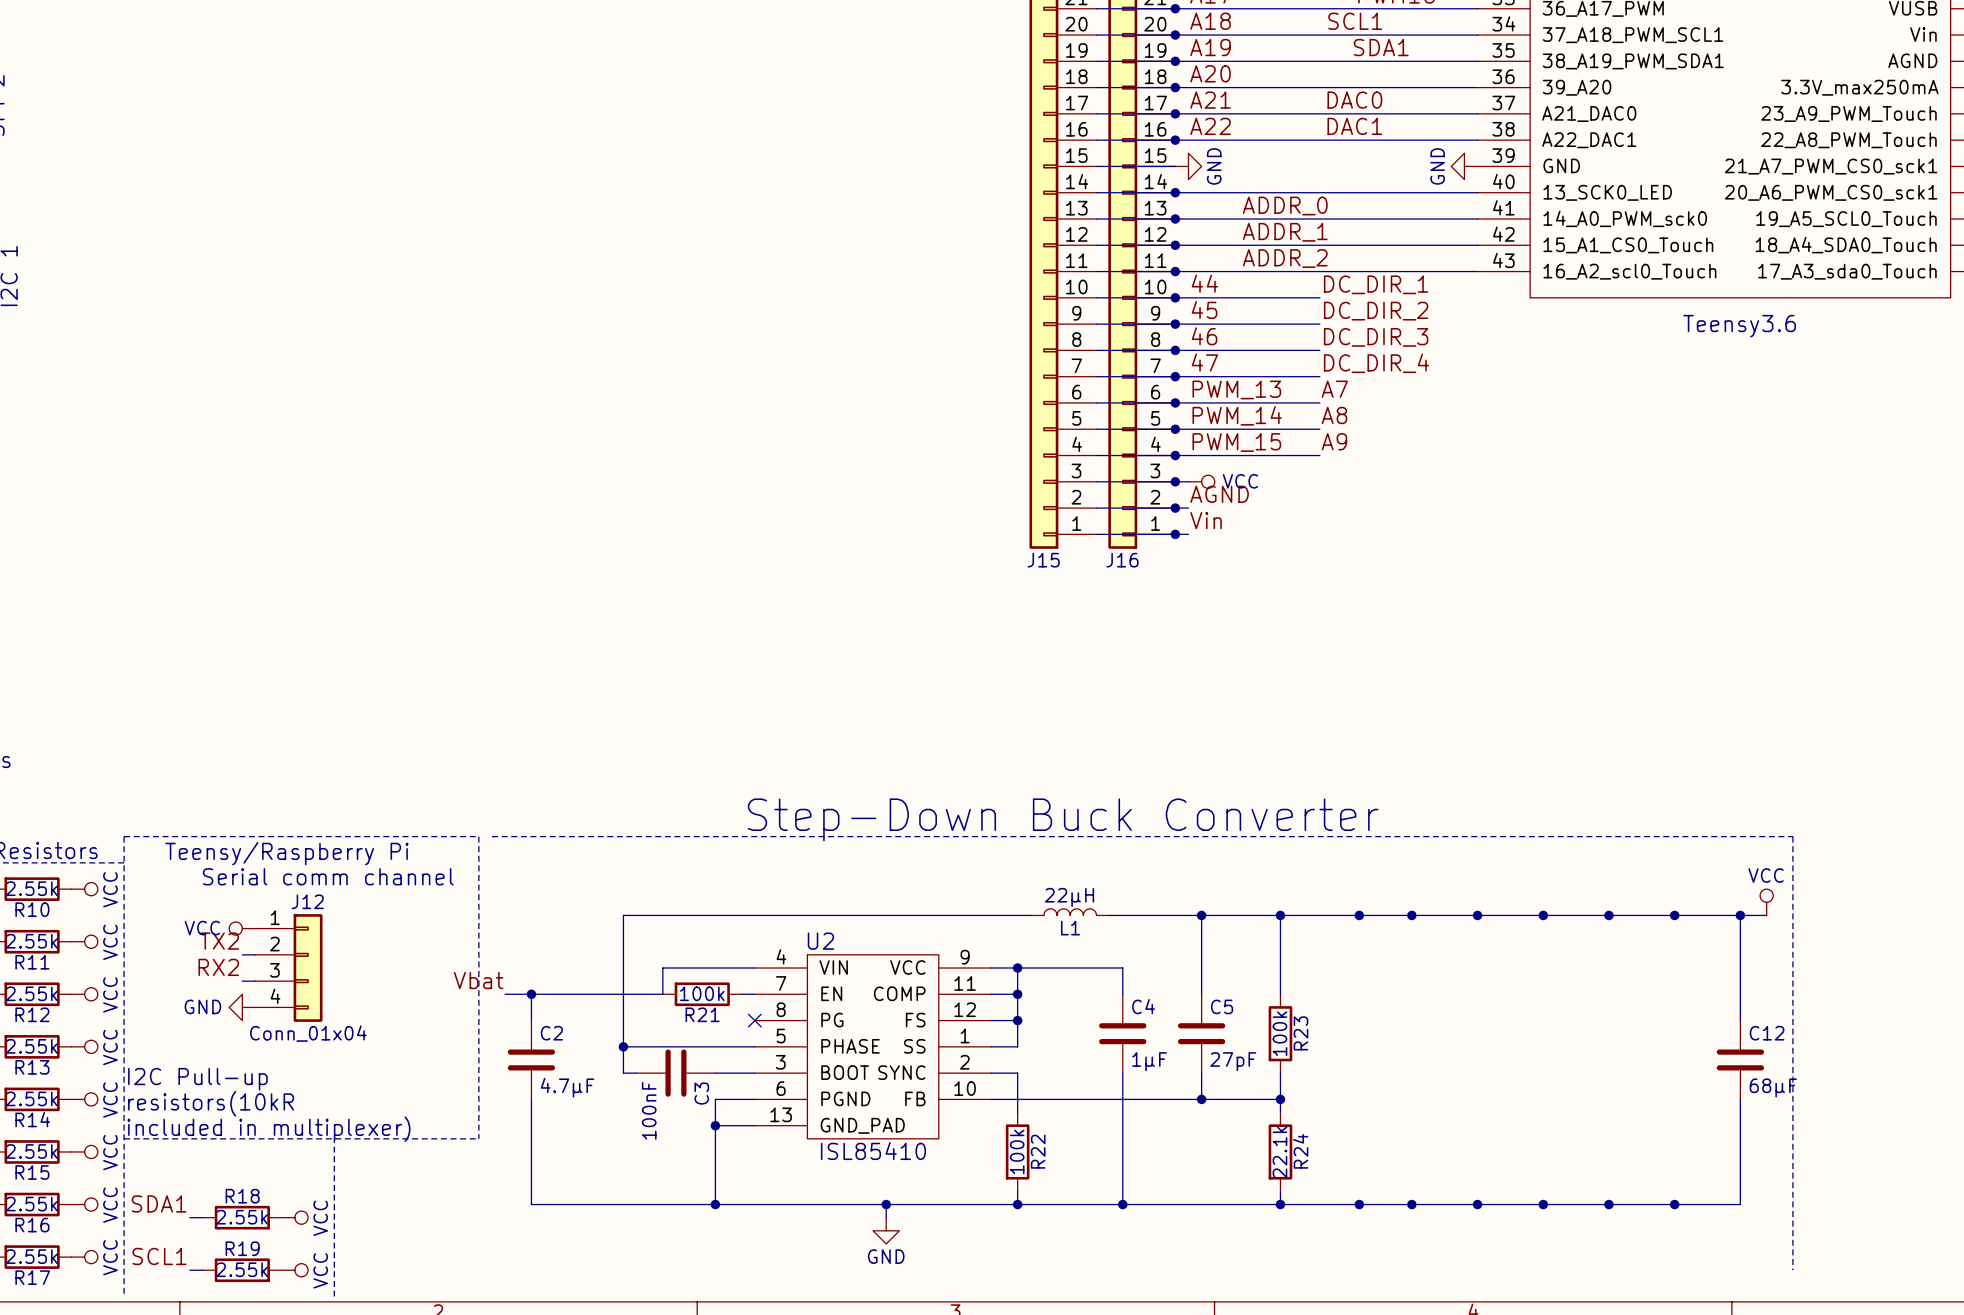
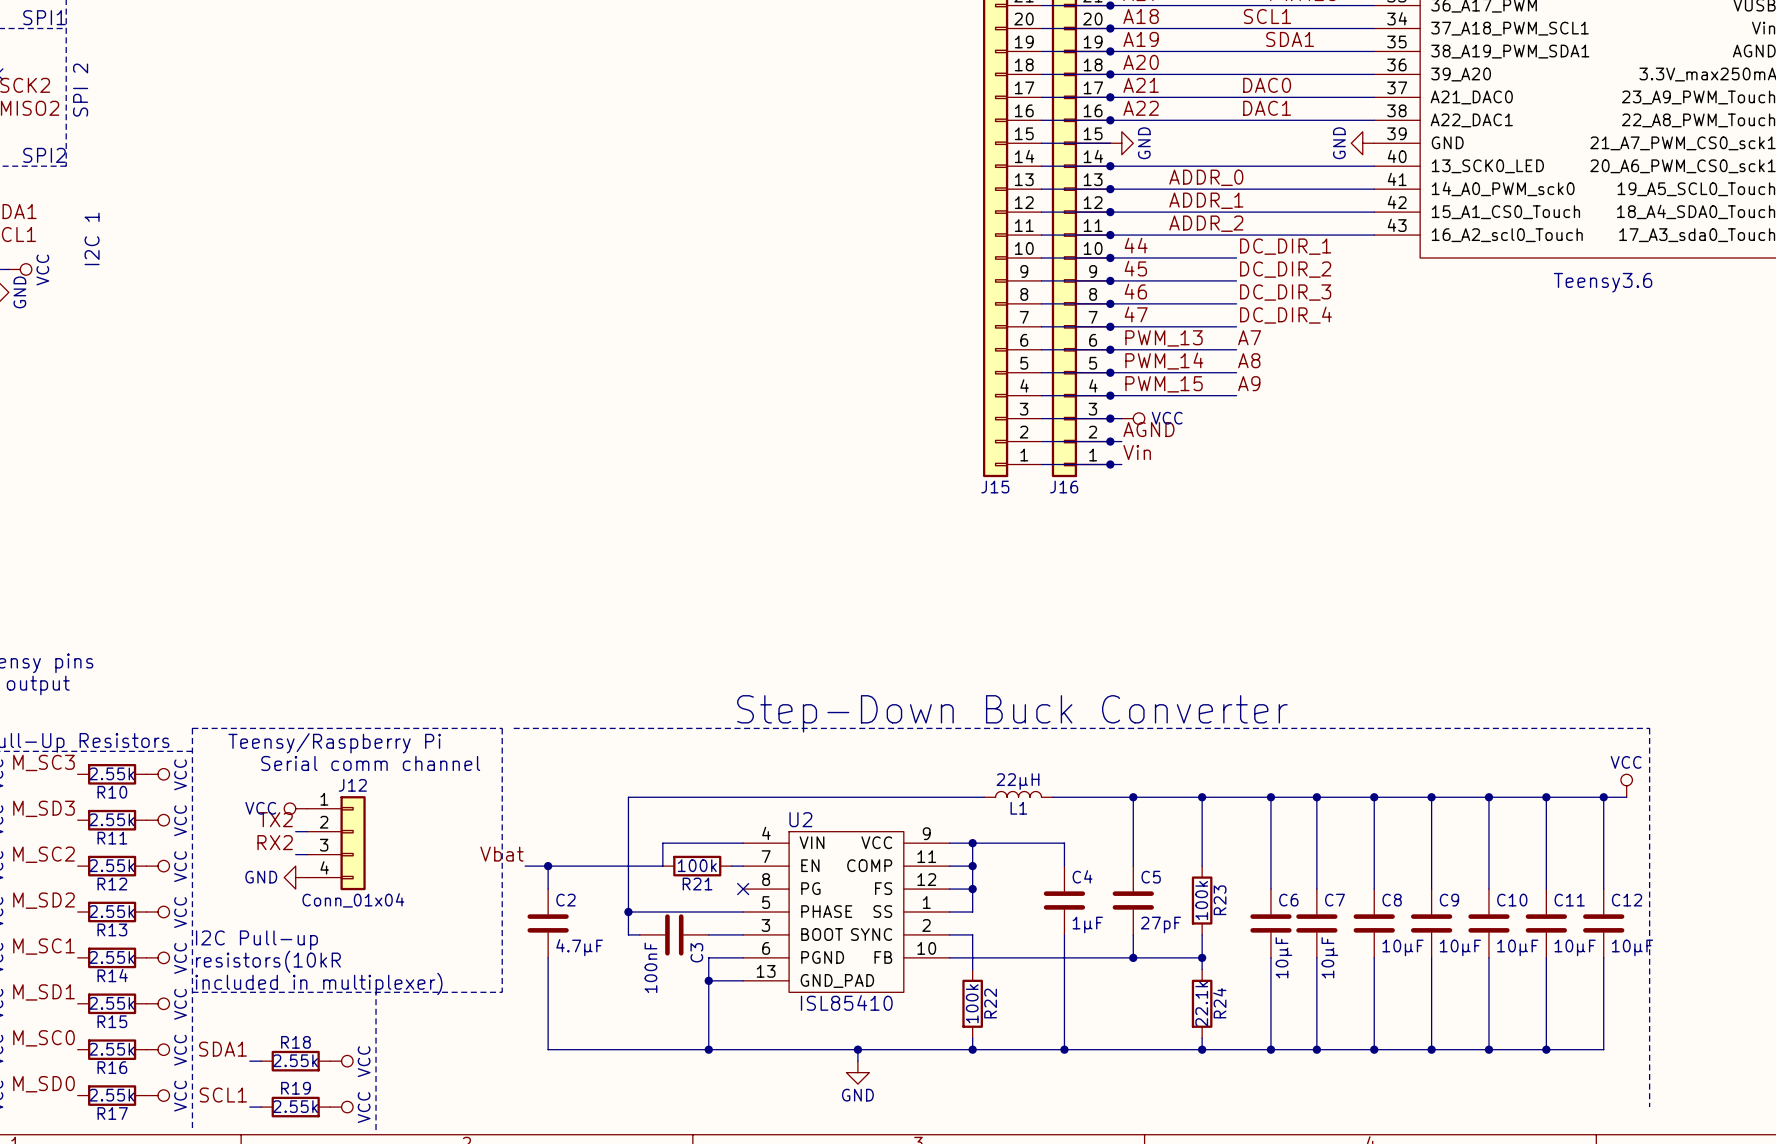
wire: none -> (1270, 797) (1270, 889)
wire: none -> (1316, 797) (1316, 889)
wire: none -> (1374, 797) (1374, 889)
wire: none -> (1431, 797) (1431, 889)
wire: none -> (1488, 797) (1488, 889)
wire: none -> (1546, 797) (1546, 889)
C6: none -> 10µF (1270, 923)
C7: none -> 10µF (1316, 923)
C8: none -> 10µF (1374, 923)
C9: none -> 10µF (1431, 923)
C10: none -> 10µF (1488, 923)
C11: none -> 10µF (1546, 923)
C12 value: 68µF (1773, 1087) -> 10µF (1632, 947)
wire: none -> (1270, 957) (1270, 1049)
wire: none -> (1316, 957) (1316, 1049)
wire: none -> (1374, 957) (1374, 1049)
wire: none -> (1431, 957) (1431, 1049)
wire: none -> (1488, 957) (1488, 1049)
wire: none -> (1546, 957) (1546, 1049)

